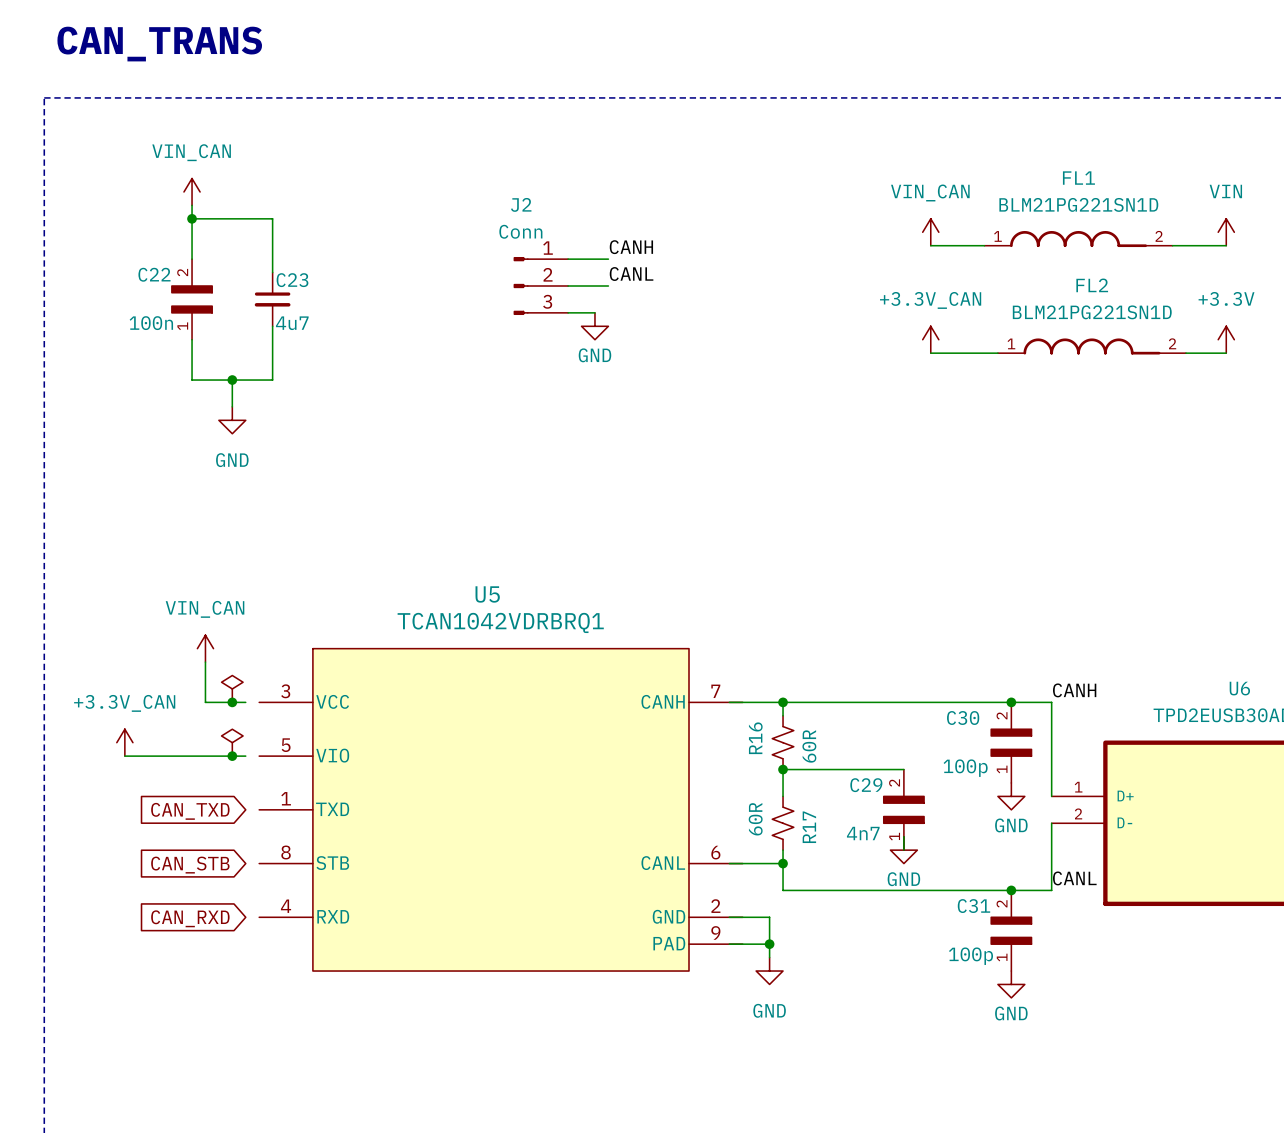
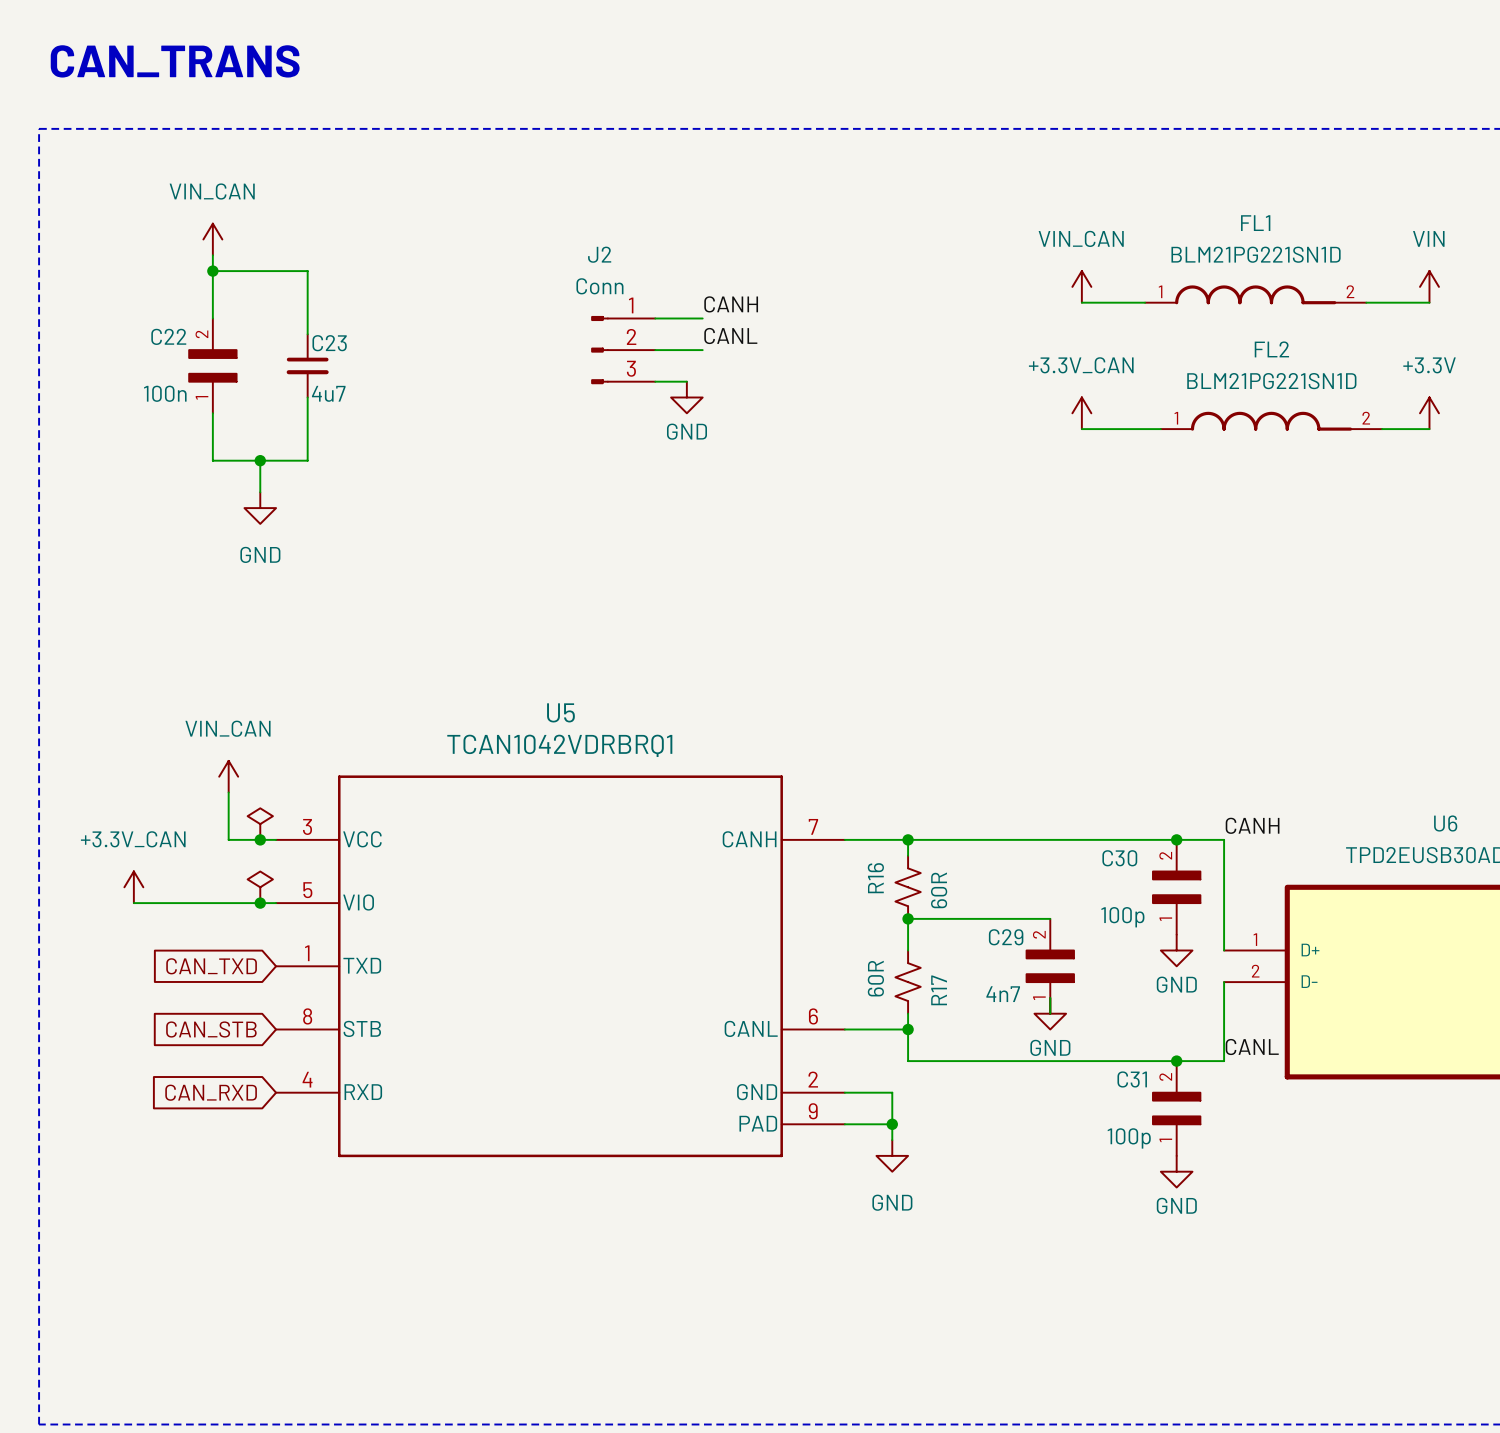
U5 symbol: [259, 648, 743, 972] -> [276, 775, 845, 1158]

